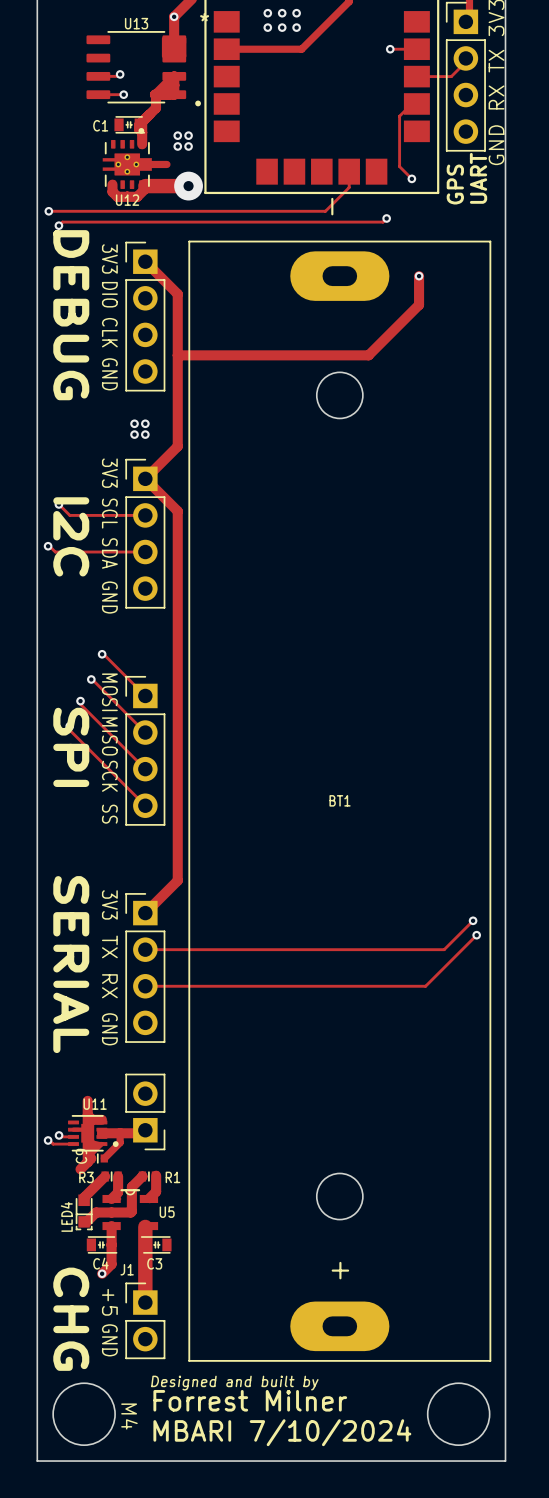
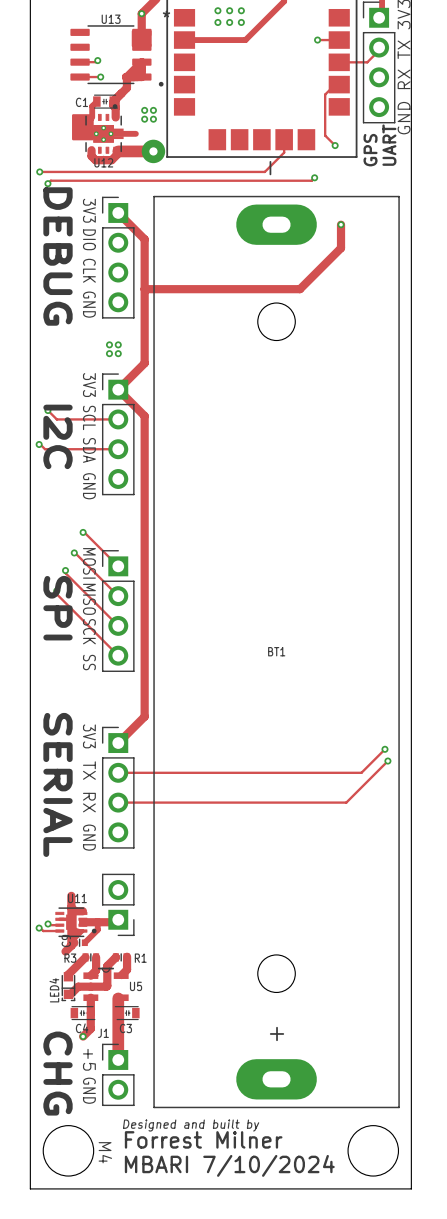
track: none -> (96, 101) (92, 106) (92, 117)
drawing: none -> [72, 114, 94, 141]

